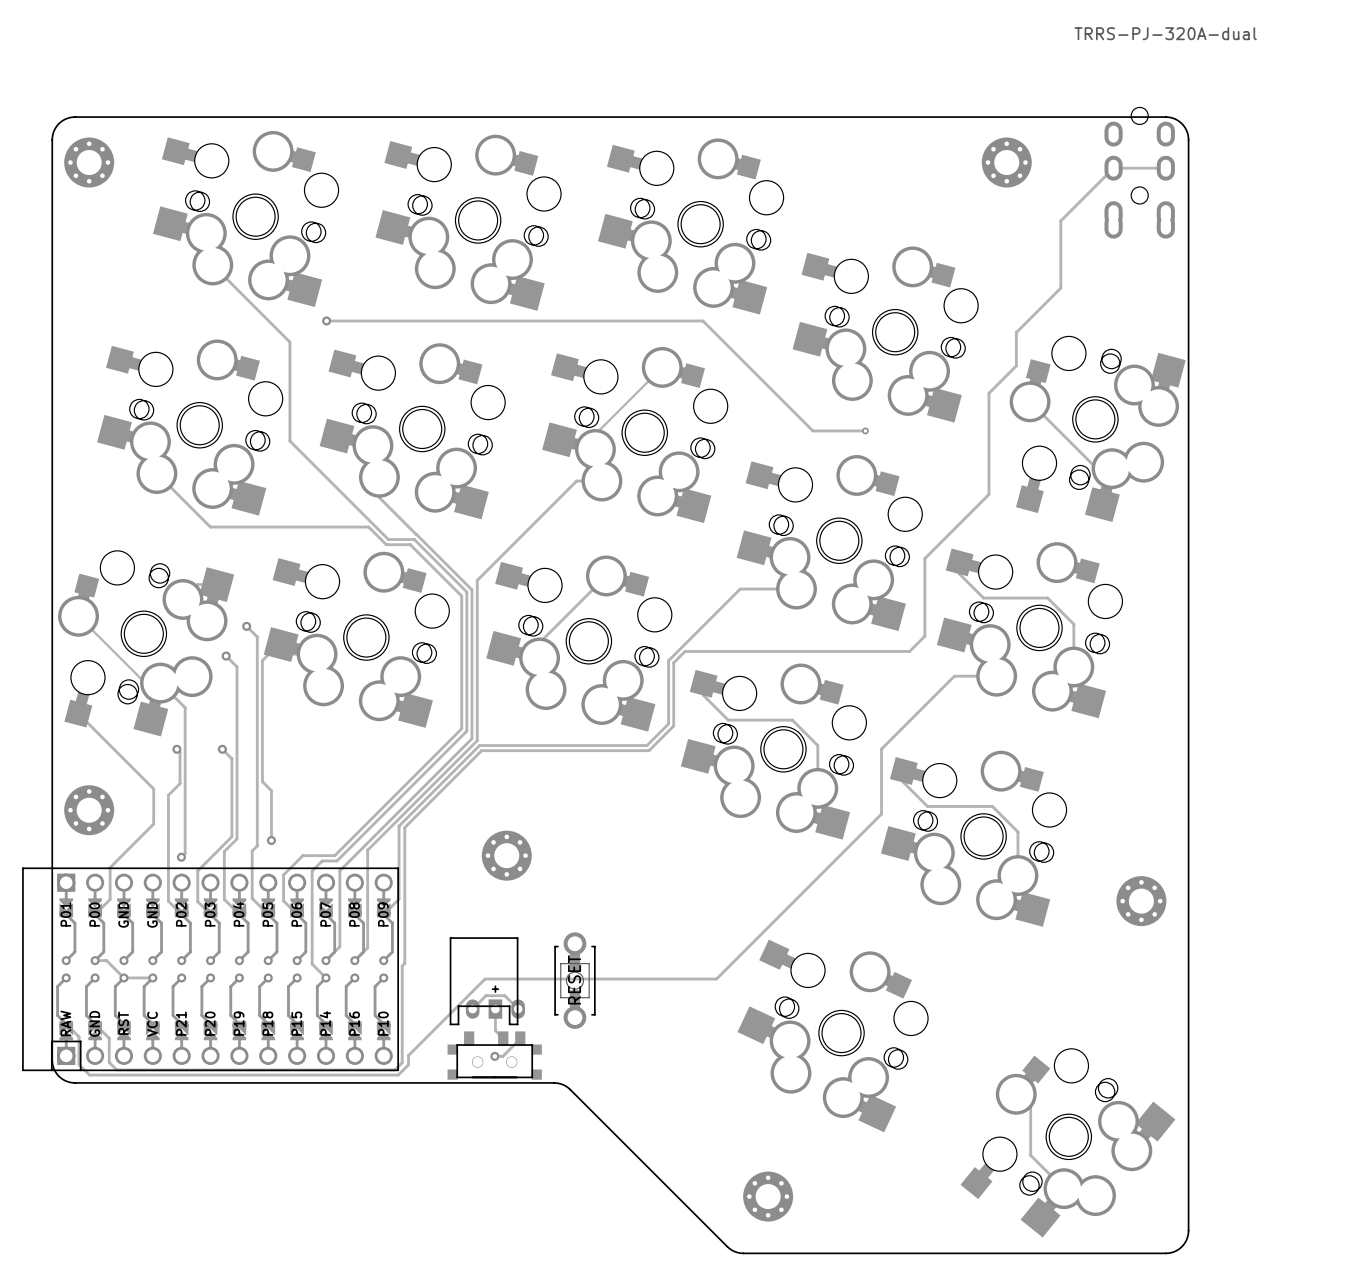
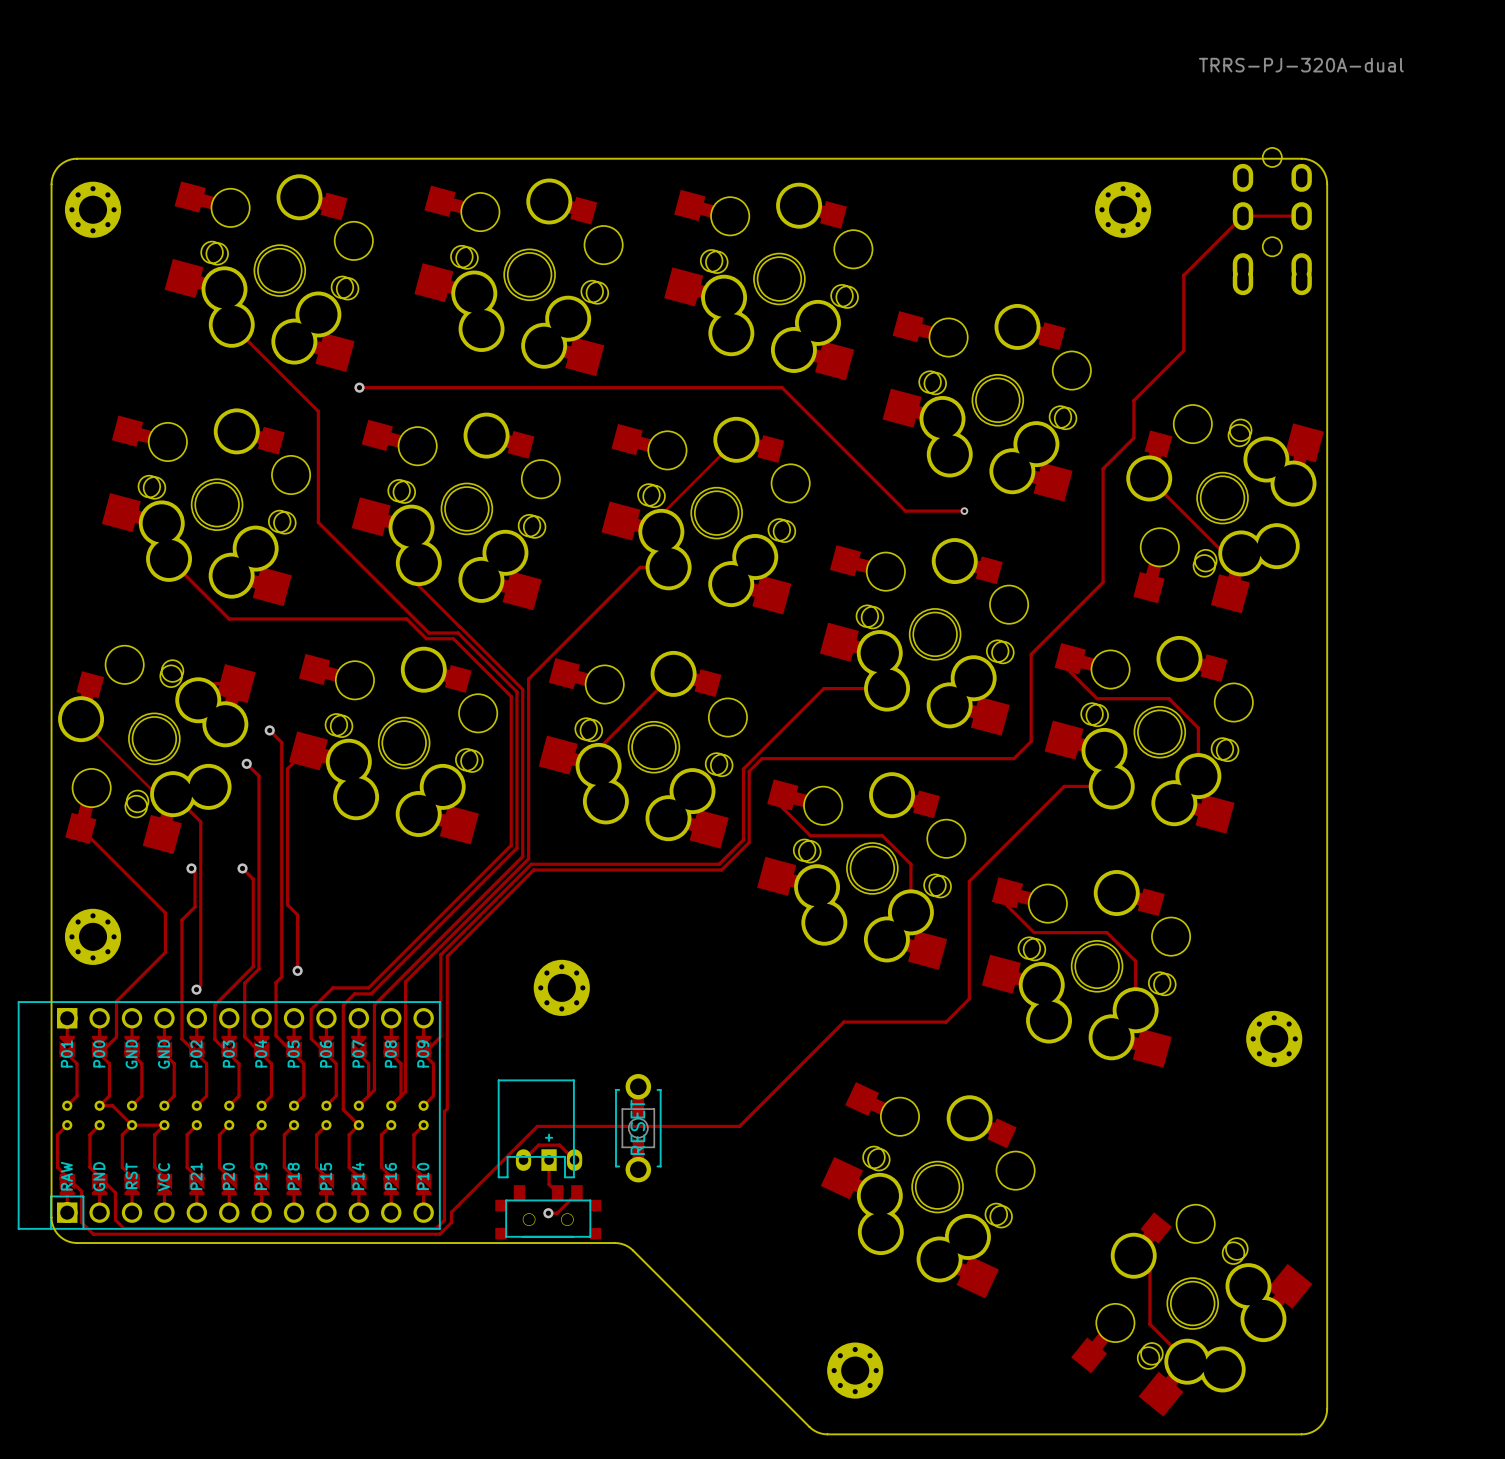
track: (881, 749) (881, 814) (716, 979) (665, 979) -> (982, 868) (969, 881) (969, 999) (946, 1022) (843, 1022) (739, 1126)

